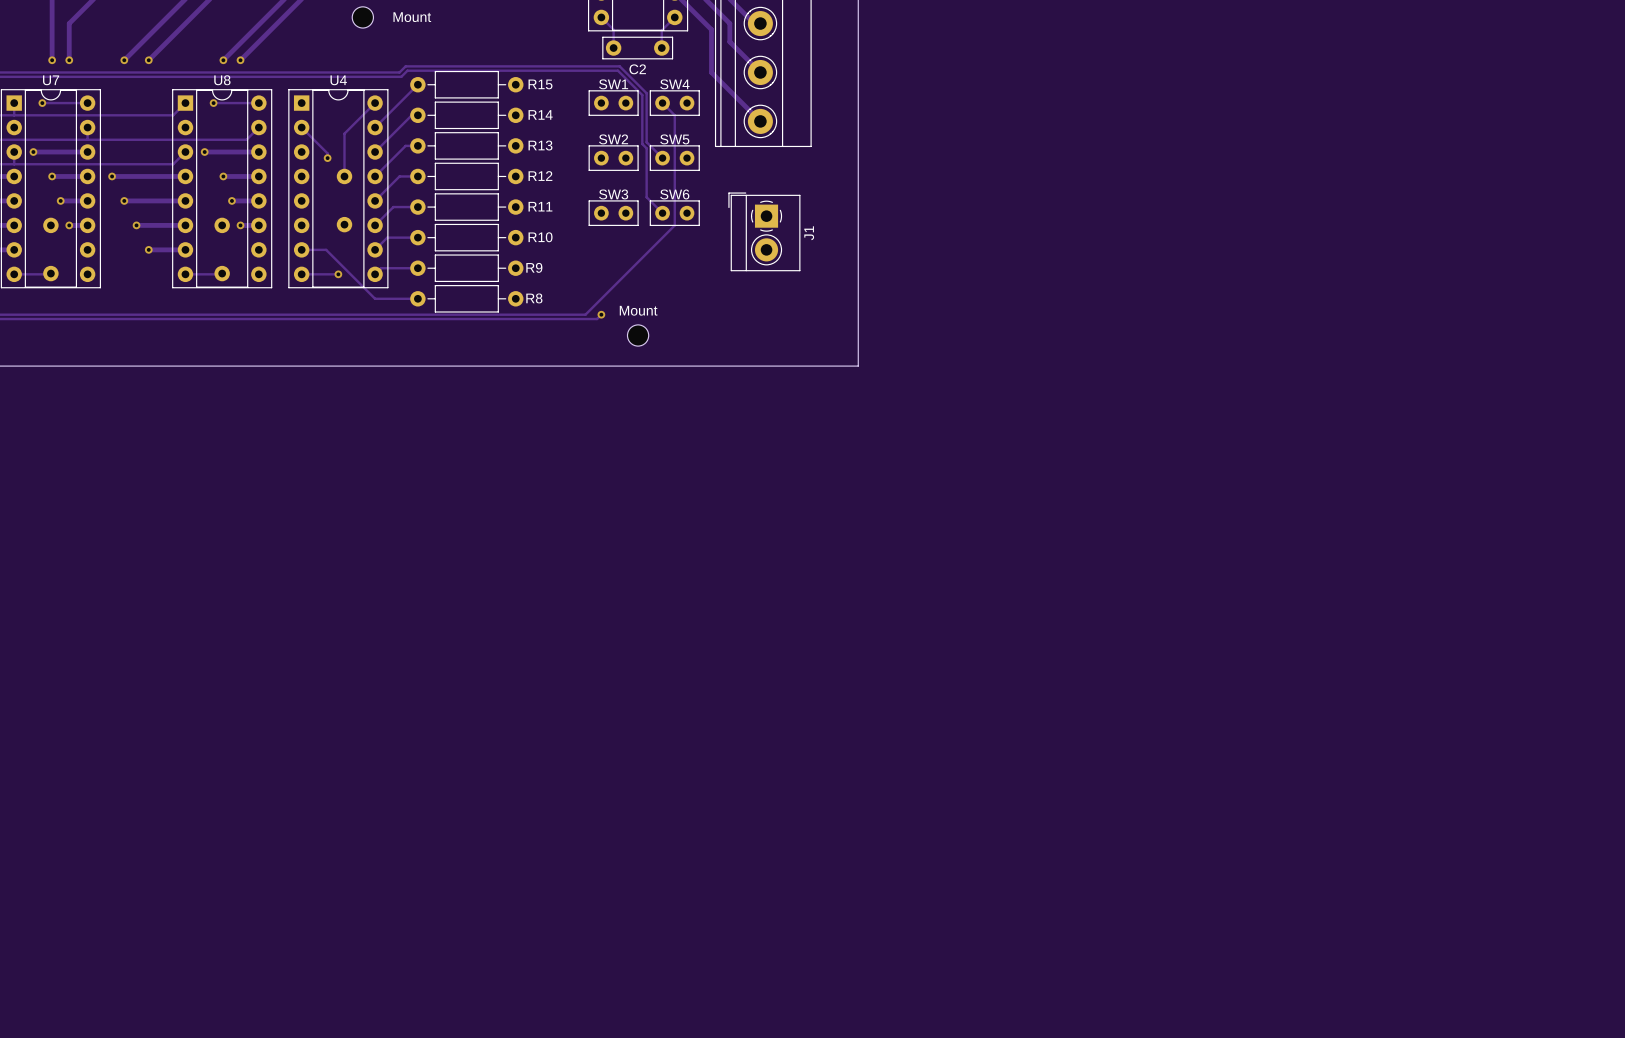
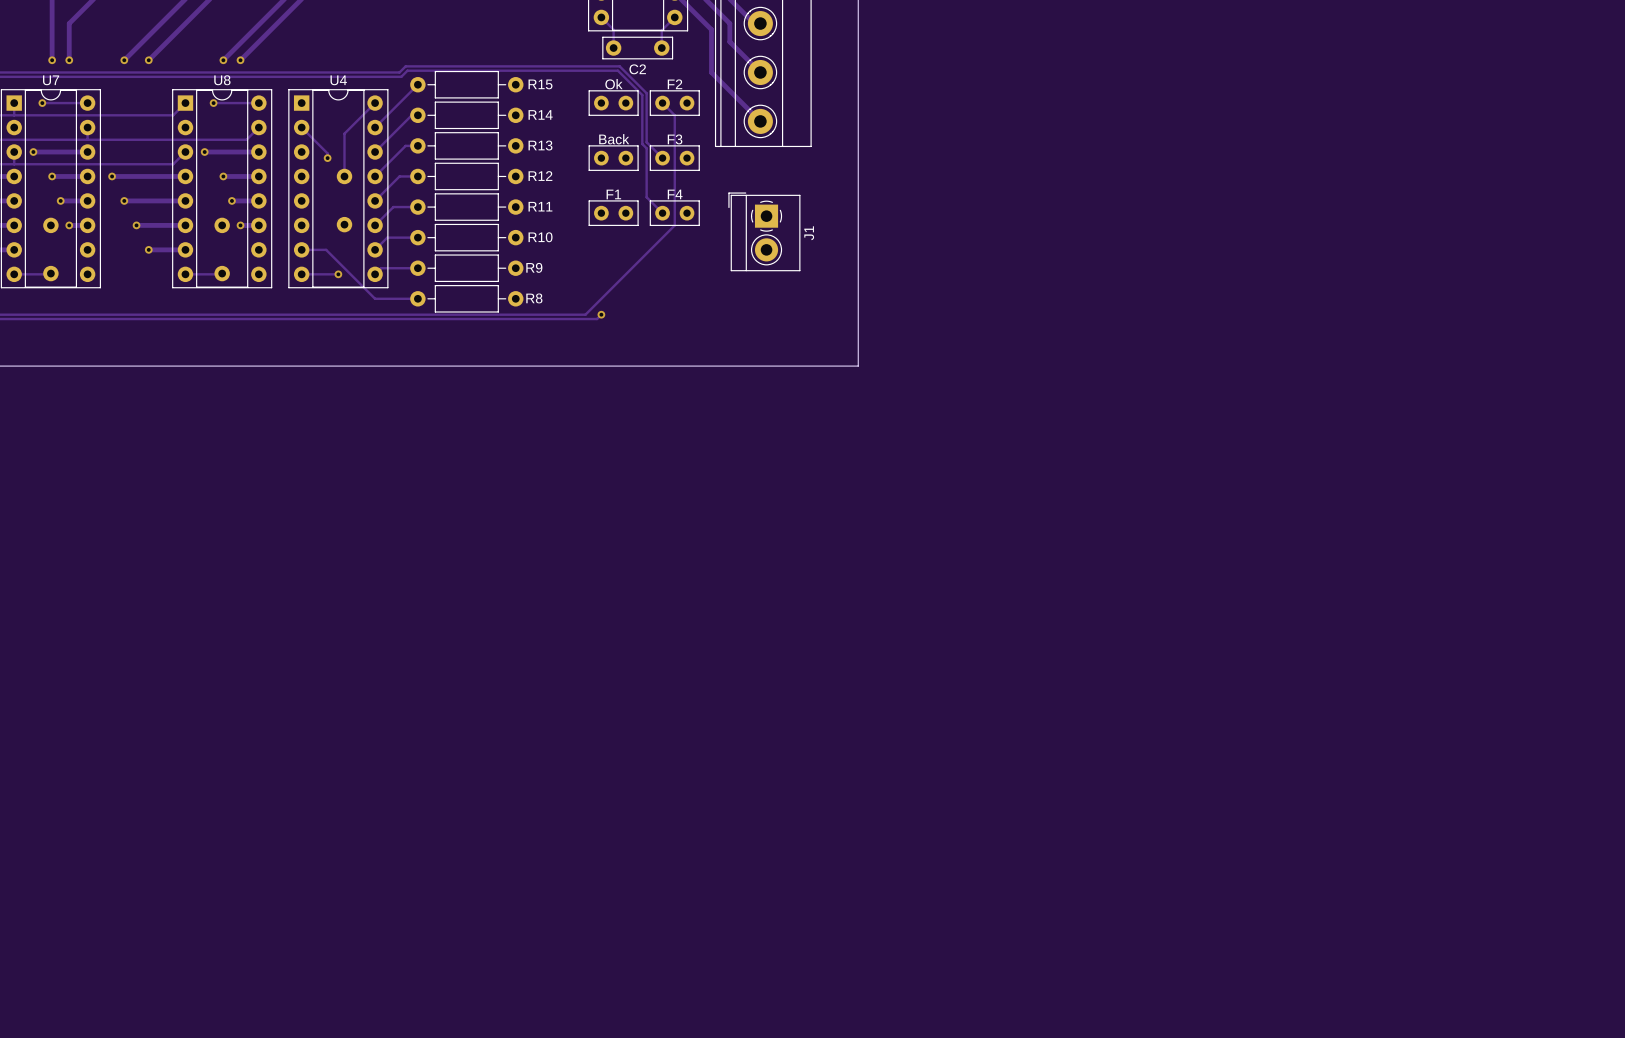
Mount: (362, 17) -> none
SW1 name: SW1 (613, 84) -> Ok (613, 84)
SW4 name: SW4 (674, 84) -> F2 (675, 84)
SW2 name: SW2 (613, 139) -> Back (614, 139)
SW5 name: SW5 (674, 139) -> F3 (675, 139)
SW3 name: SW3 (613, 194) -> F1 (613, 194)
SW6 name: SW6 (674, 194) -> F4 (675, 194)
Mount: (638, 335) -> none

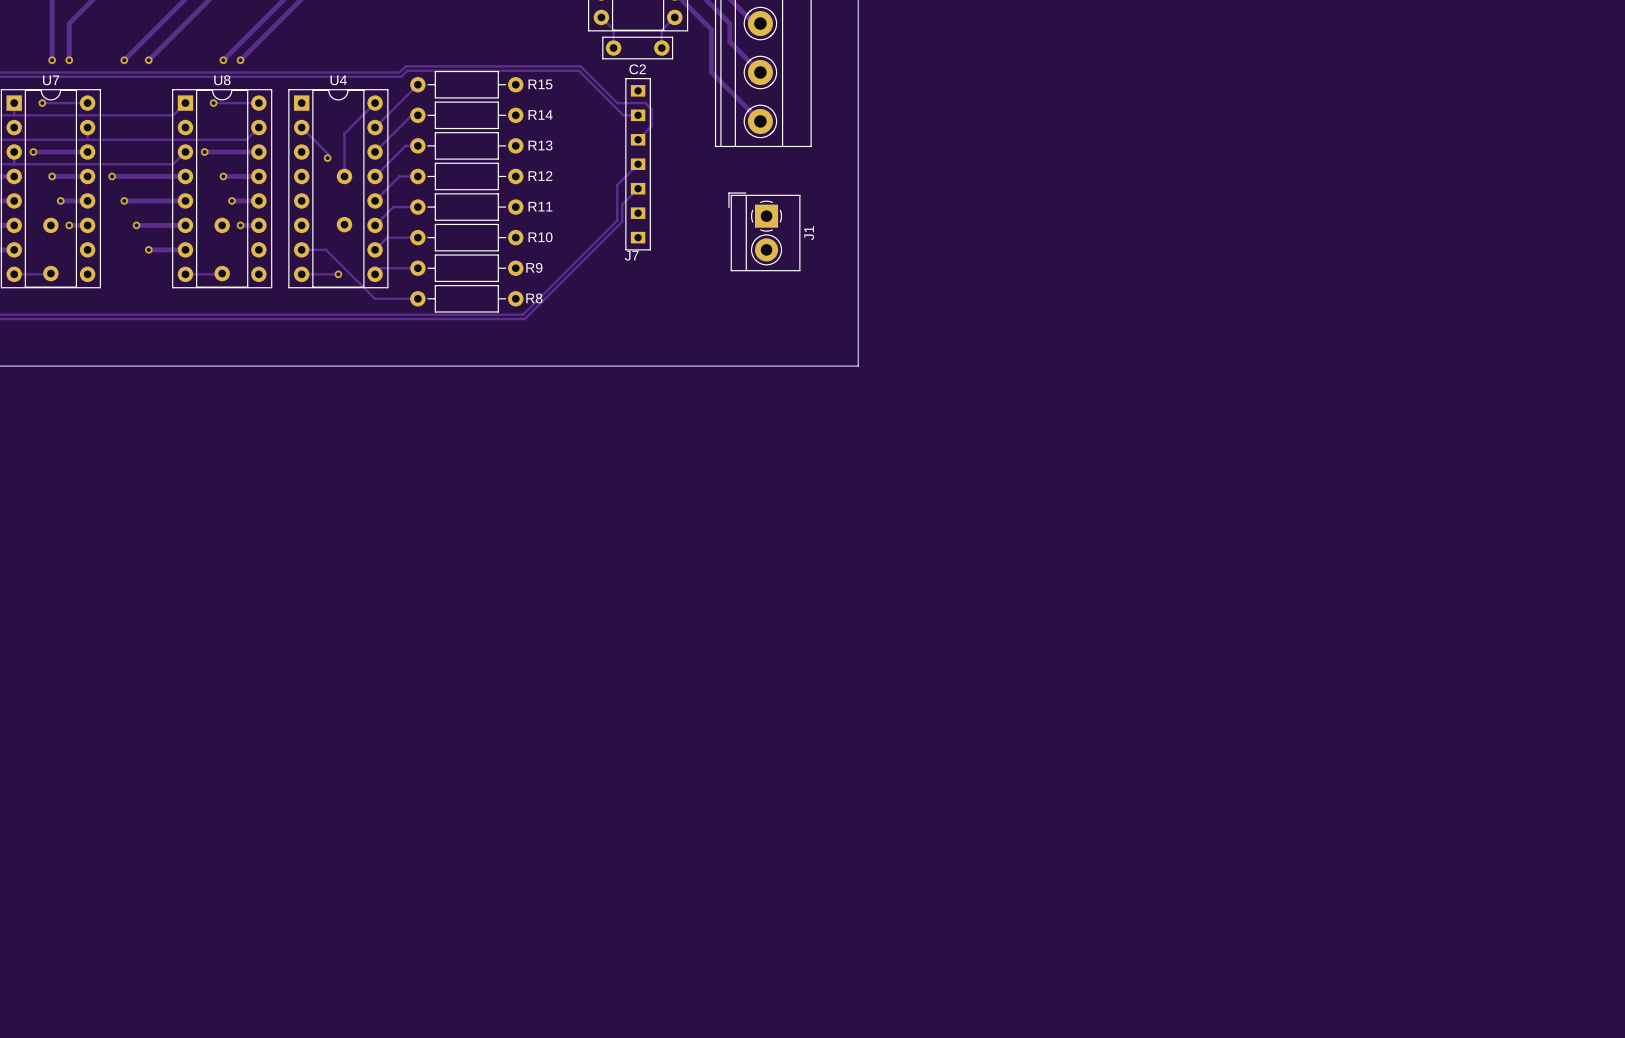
track: (580, 66) (619, 66) (646, 93) (646, 142) (662, 158) -> (580, 66) (617, 103) (645, 103) (651, 109) (651, 126) (638, 139)
track: (578, 70) (617, 70) (642, 95) (642, 144) (646, 148) (646, 197) (662, 213) -> (578, 70) (623, 115) (638, 115)
Ok: (613, 103) -> none
track: (662, 103) (674, 115) (674, 225) (585, 314) (523, 314) -> (638, 164) (617, 185) (617, 220) (523, 314)
F2: (674, 103) -> none
Back: (613, 158) -> none
F3: (674, 158) -> none
J7: none -> (638, 164)
F1: (613, 213) -> none
F4: (674, 213) -> none
track: (601, 314) (597, 319) (524, 319) -> (638, 188) (622, 204) (622, 221) (524, 319)
via: (601, 314) -> none

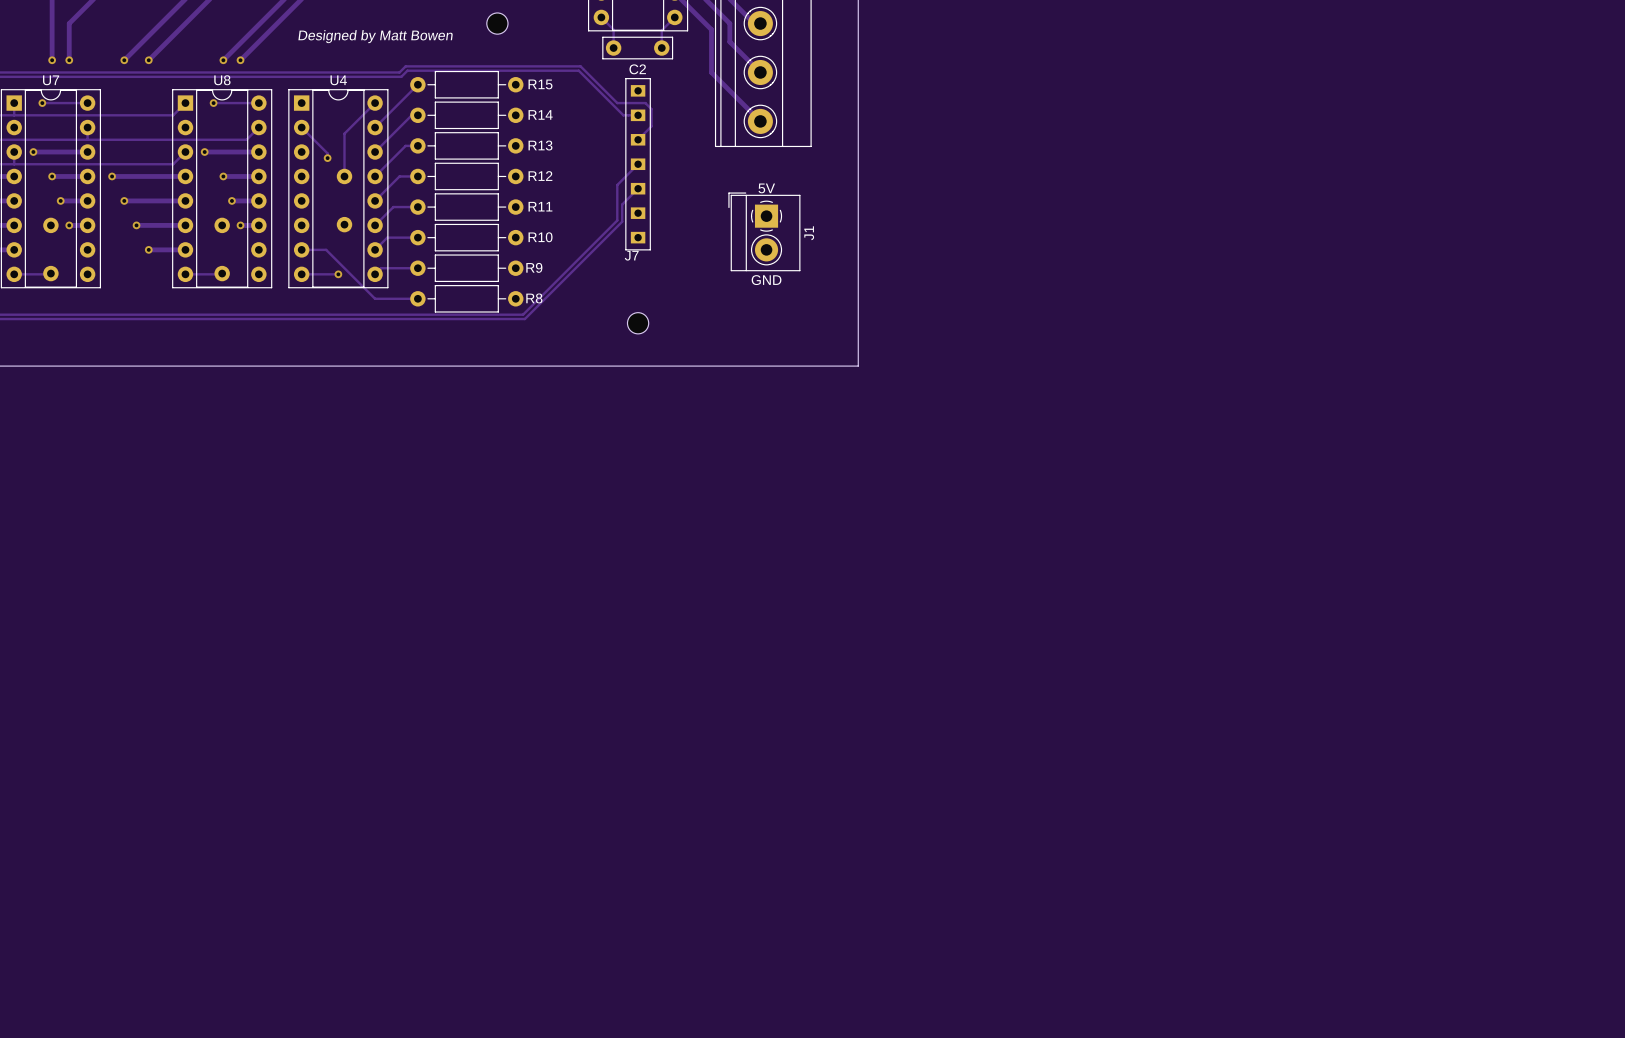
part: none -> (497, 23)
text: none -> Designed by Matt Bowen (375, 36)
text: none -> 5V (766, 188)
text: none -> GND (766, 280)
part: none -> (638, 323)

